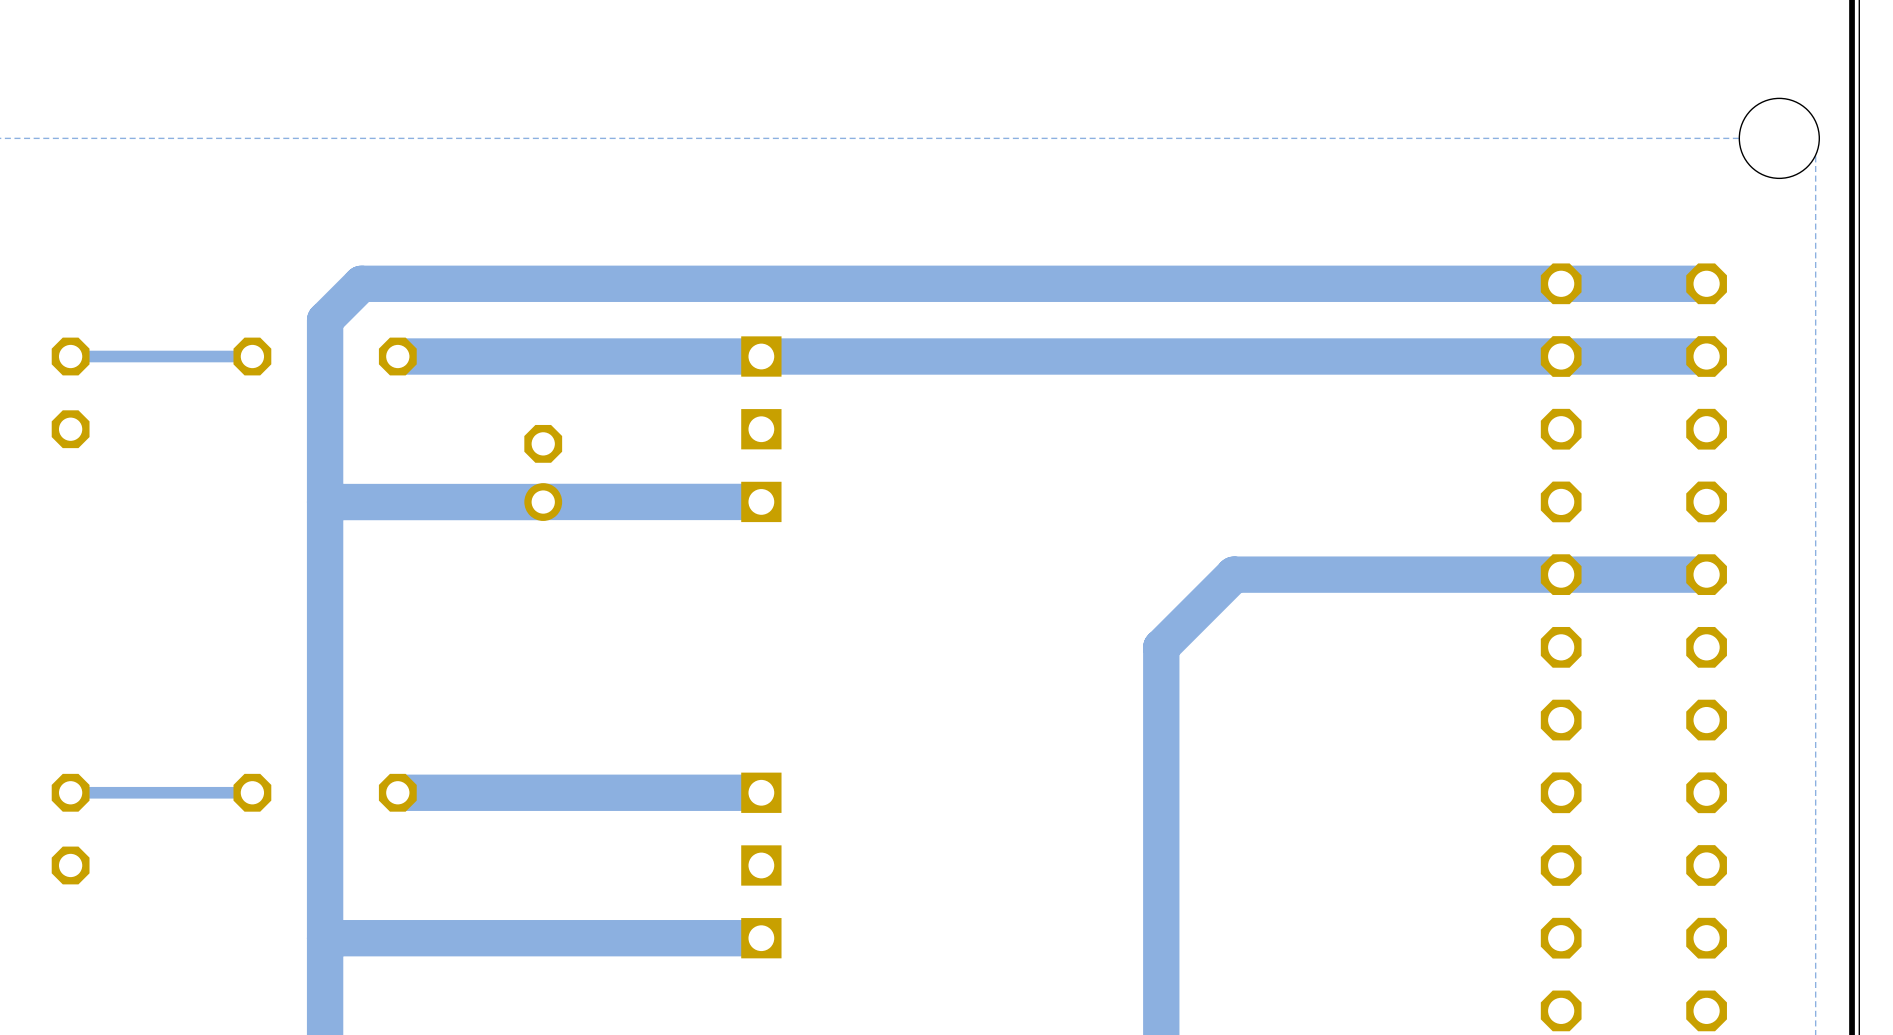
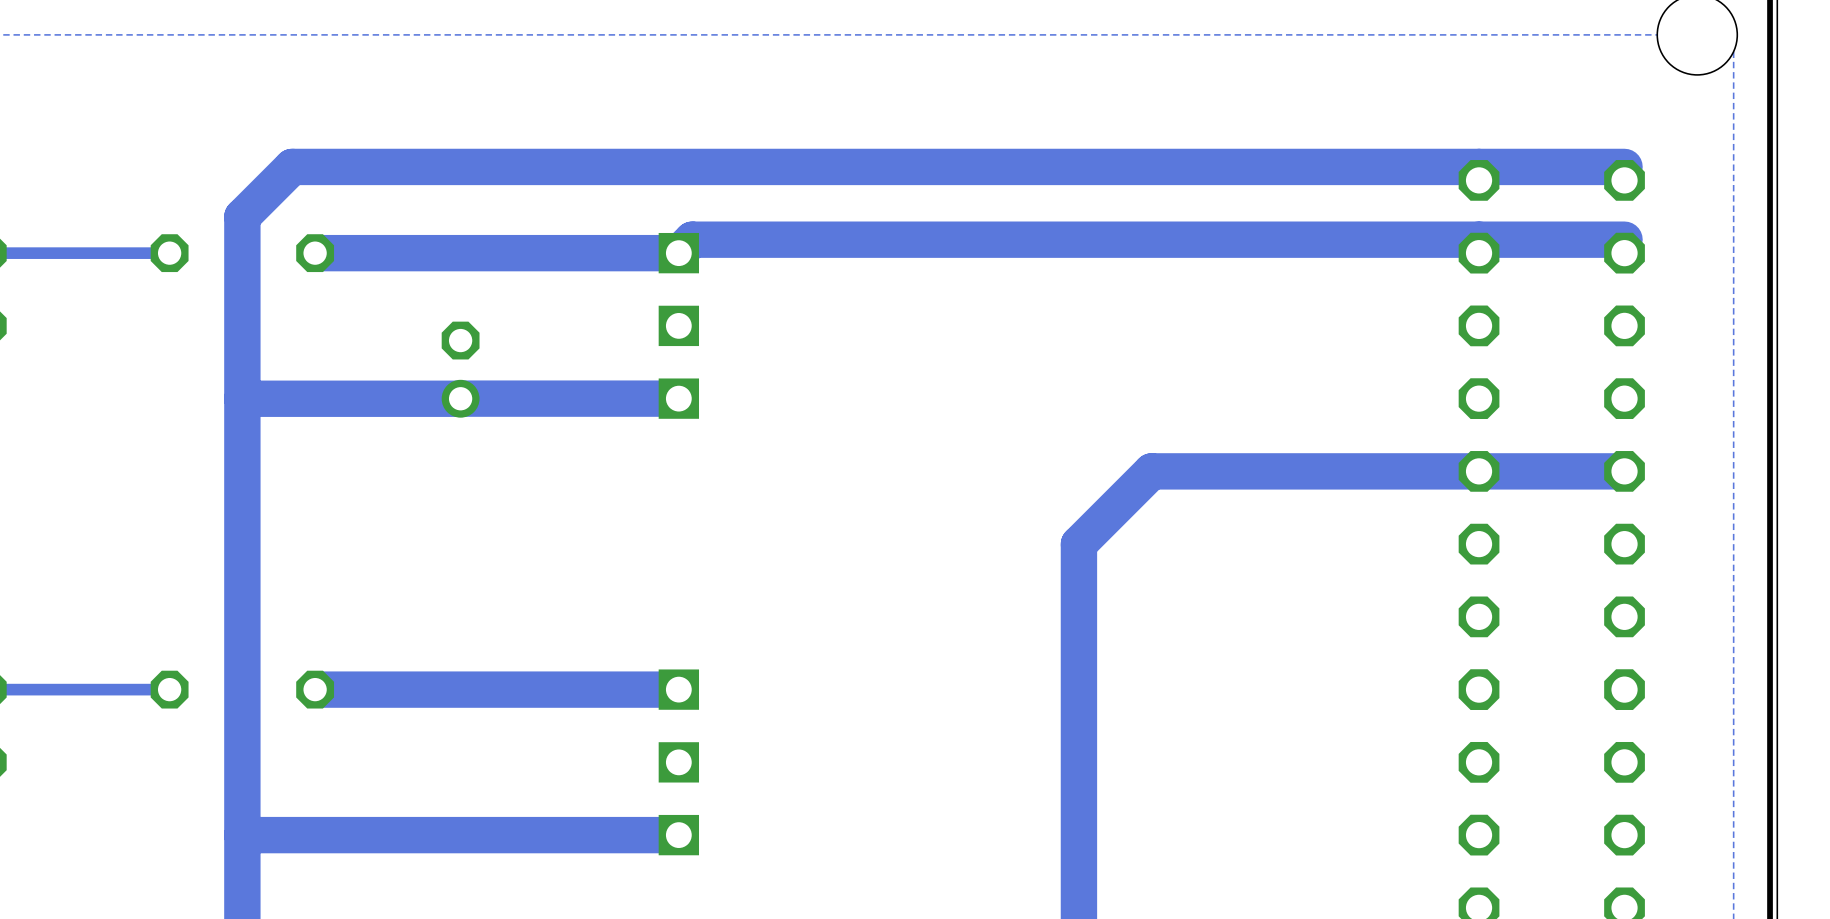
track: (1706, 283) (361, 283) -> (1624, 166) (292, 166) (278, 180)
track: (1706, 356) (761, 356) -> (1624, 239) (692, 239) (678, 253)

